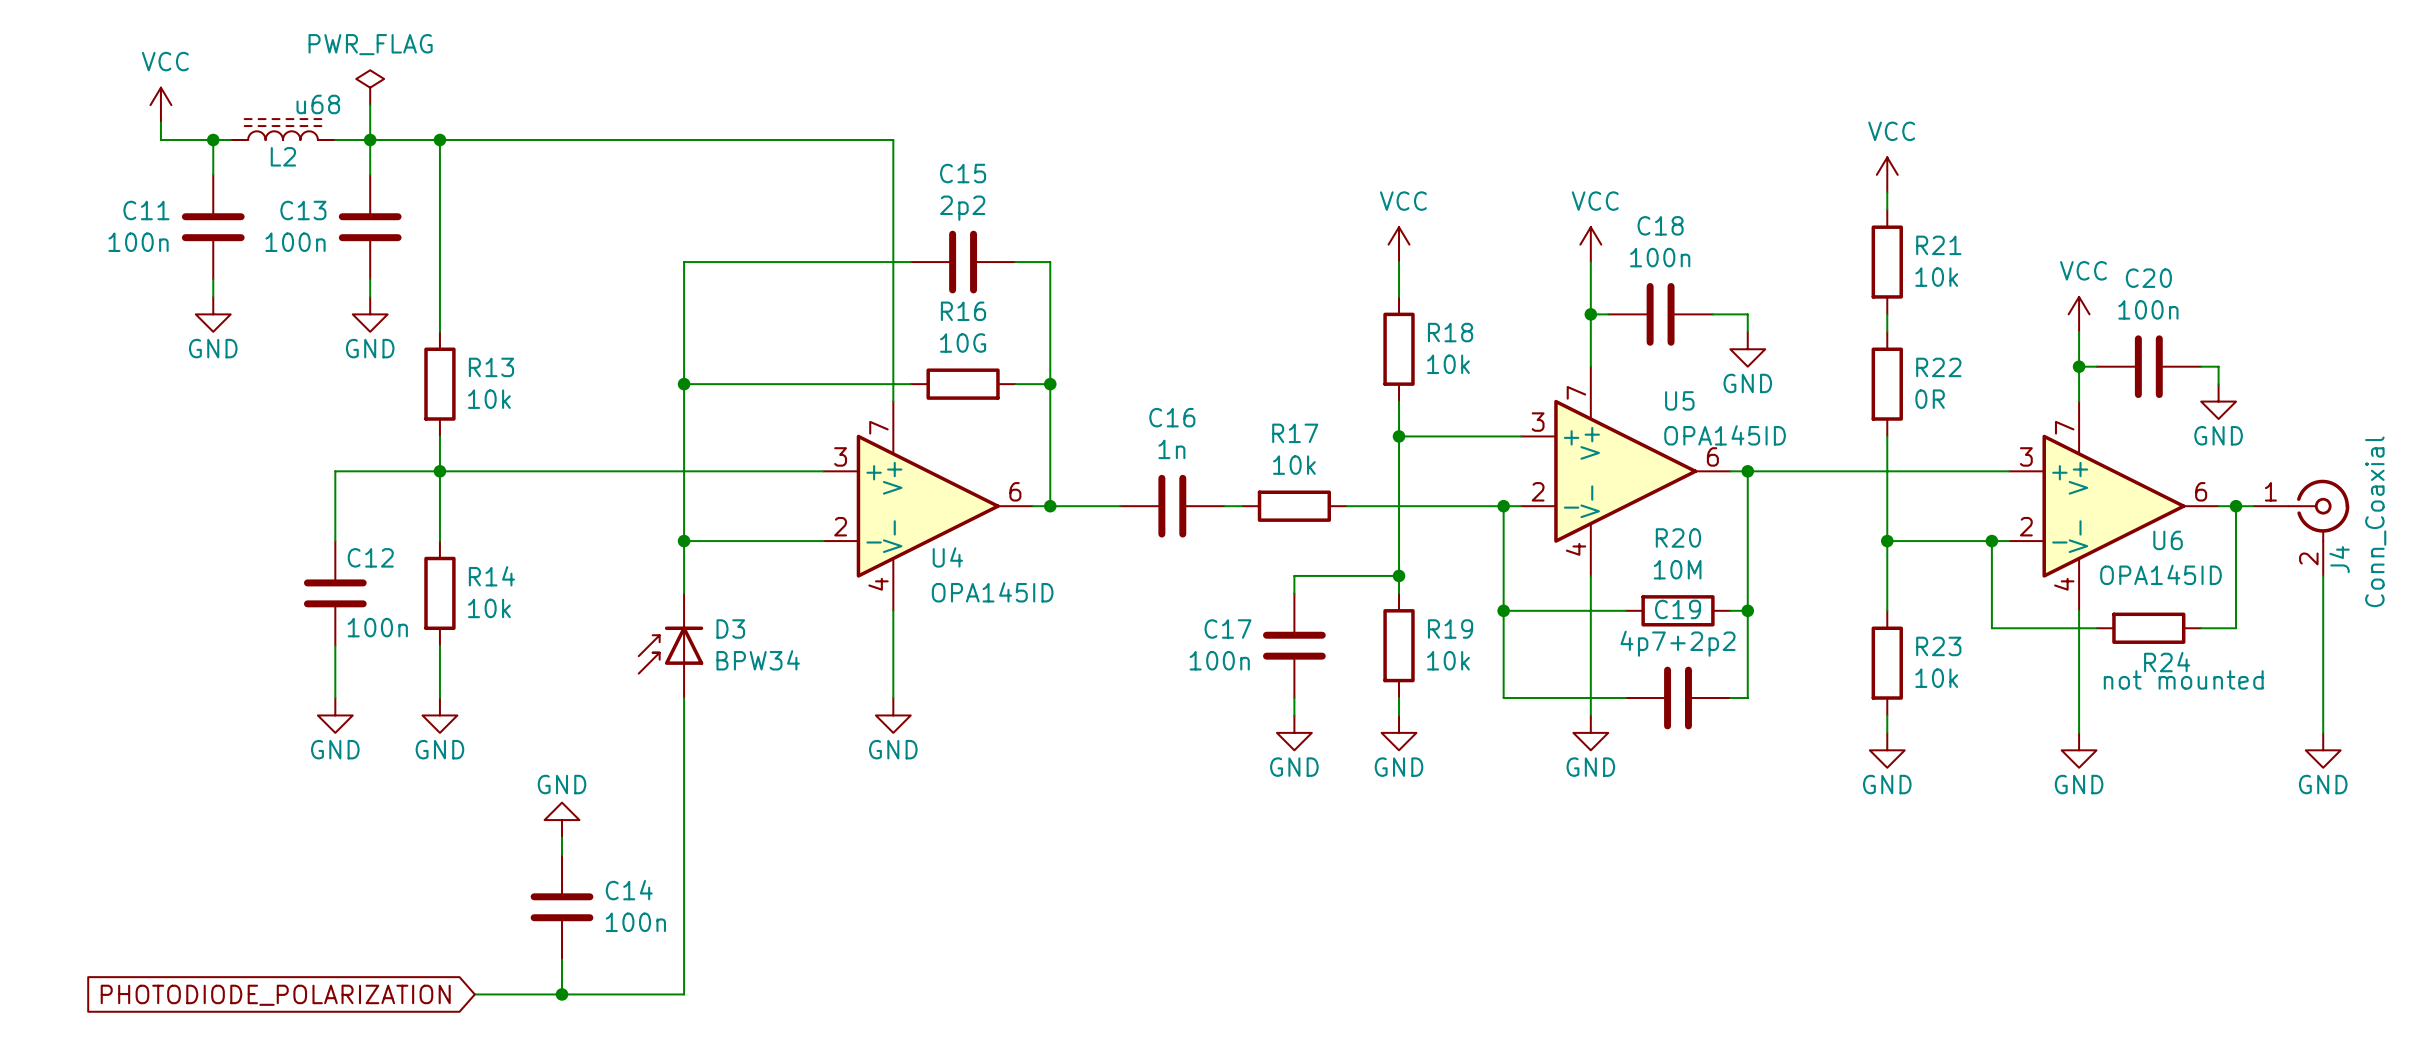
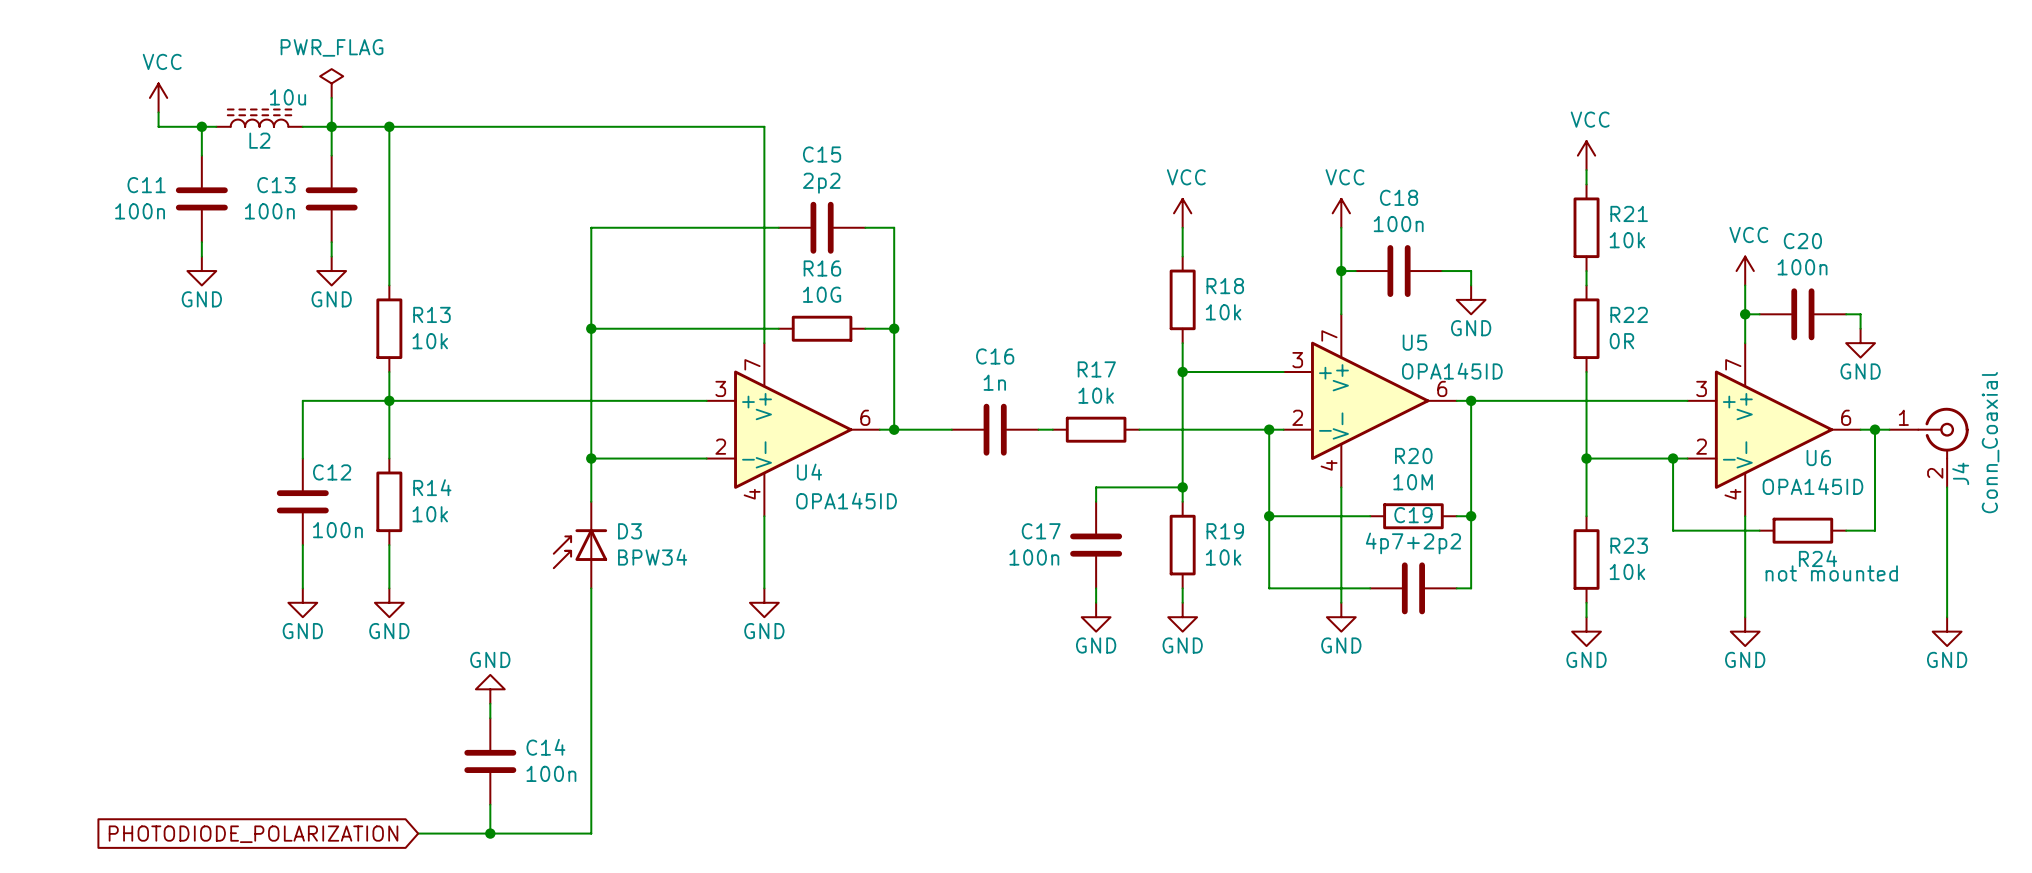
L2 value: u68 (318, 104) -> 10u (288, 97)

